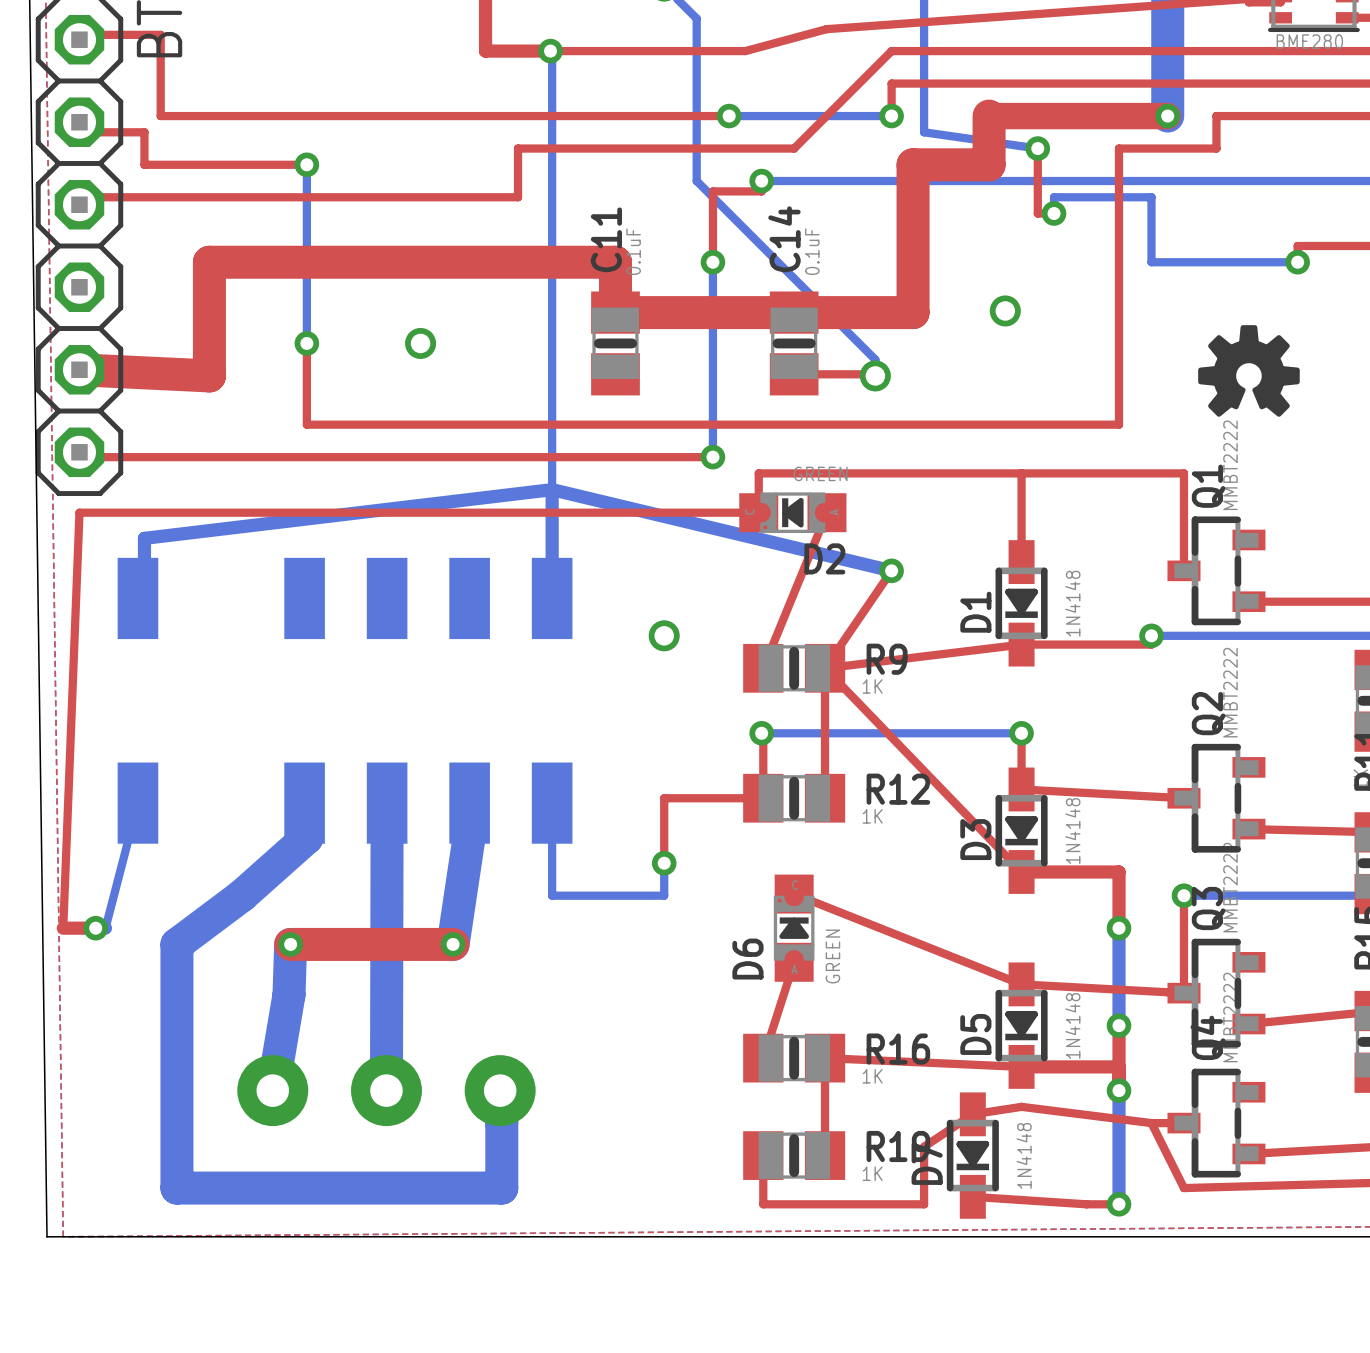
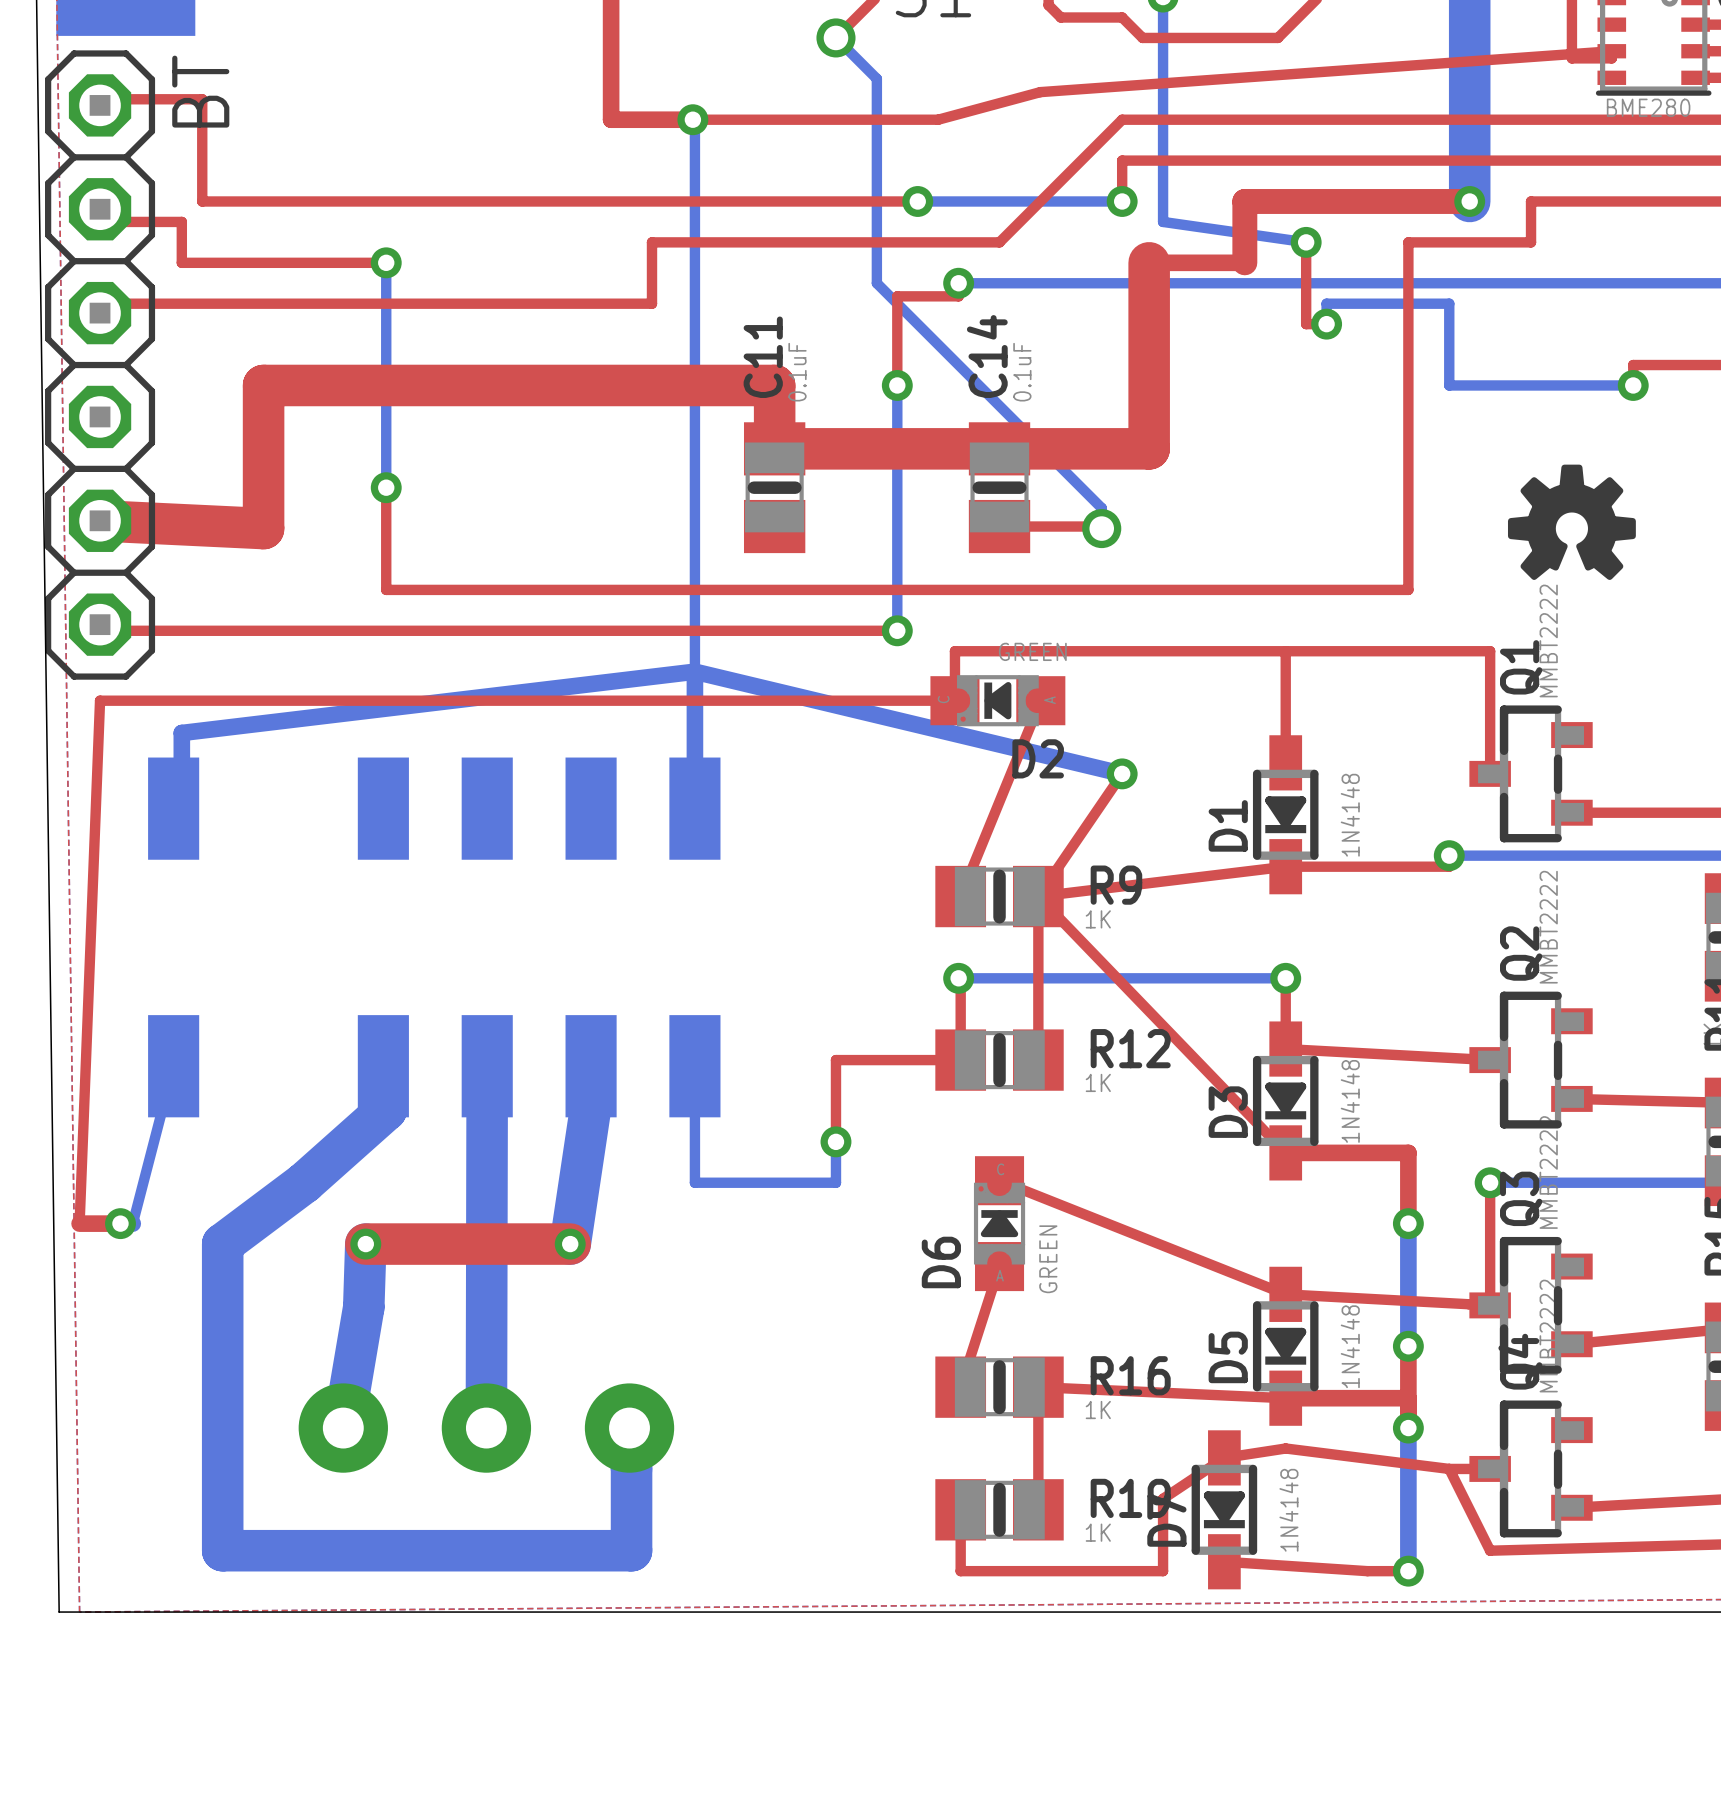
top track width: thick (1167, 116) (989, 116) (989, 164) (913, 164) -> thin (1469, 201) (1244, 201) (1244, 262) (1149, 262)
via: (1005, 310) -> none
via: (420, 343) -> none
via: (664, 635) -> none

